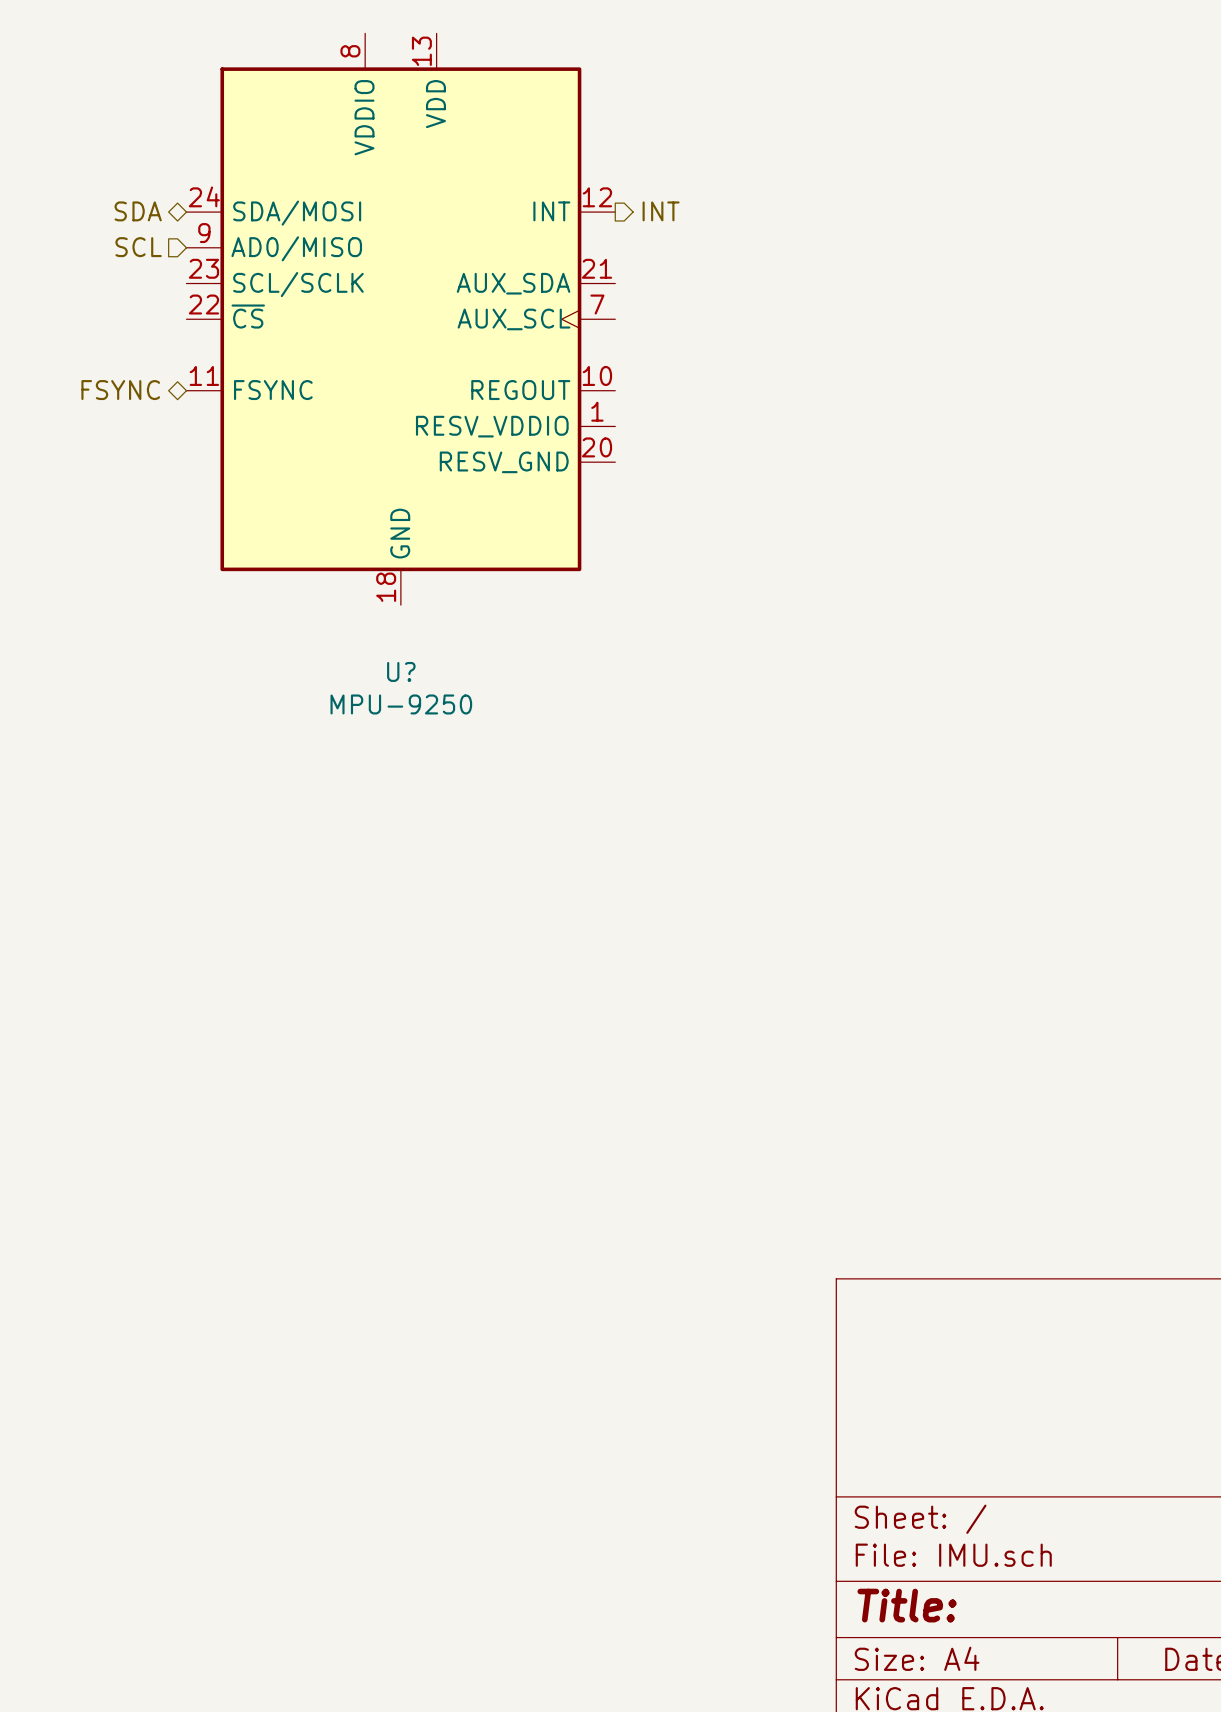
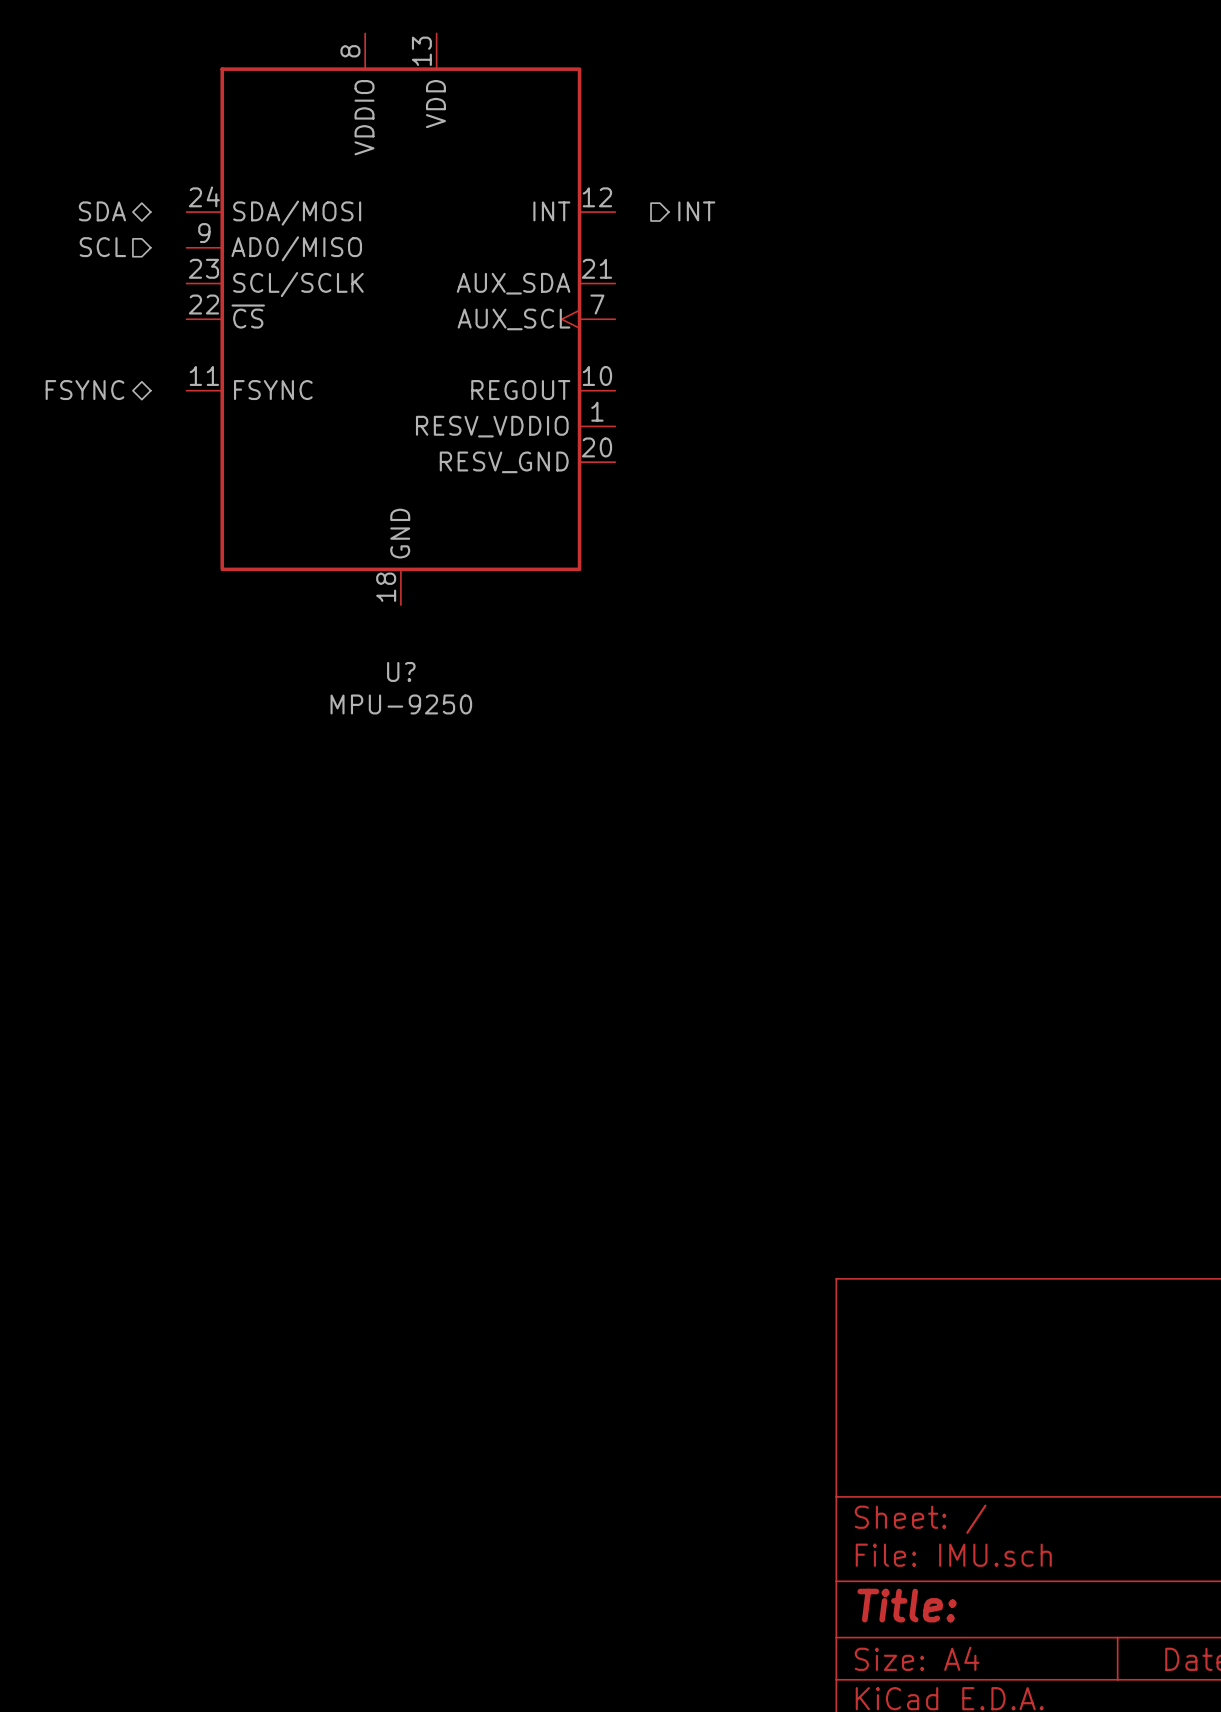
hierarchical label position: SDA (138, 211) -> SDA (102, 211)
hierarchical label position: INT (661, 211) -> INT (696, 211)
hierarchical label position: SCL (138, 247) -> SCL (102, 247)
hierarchical label position: FSYNC (120, 390) -> FSYNC (85, 390)

